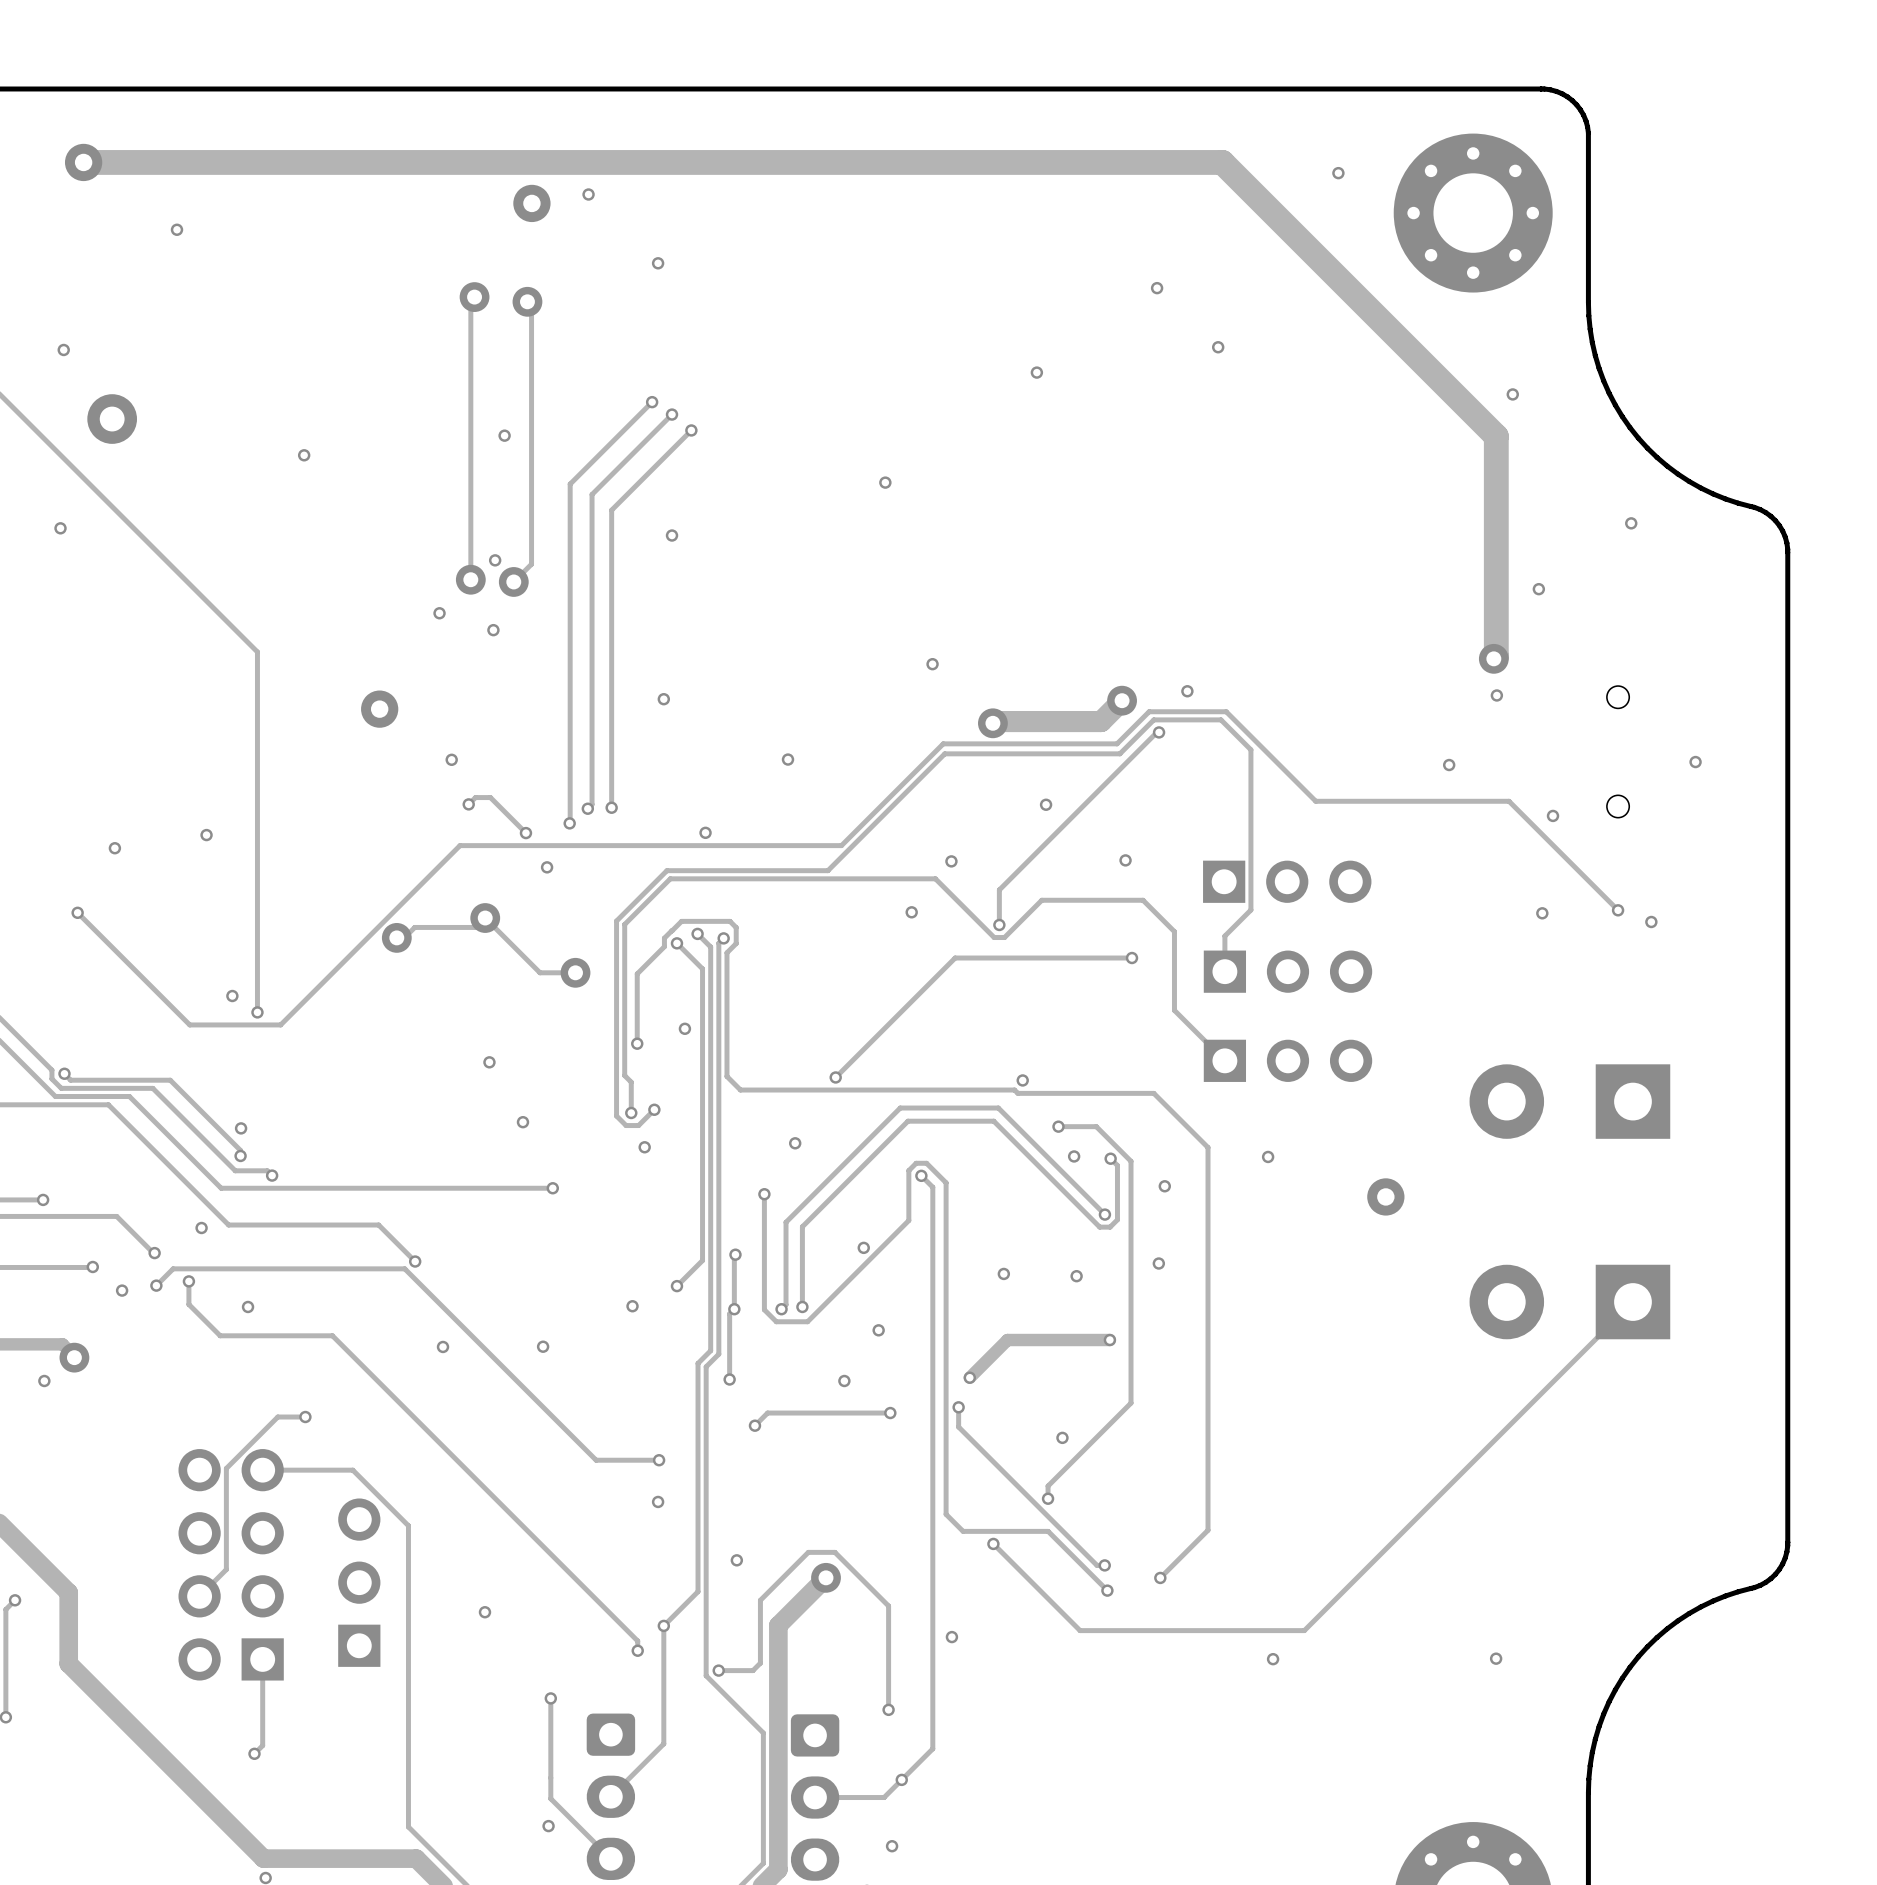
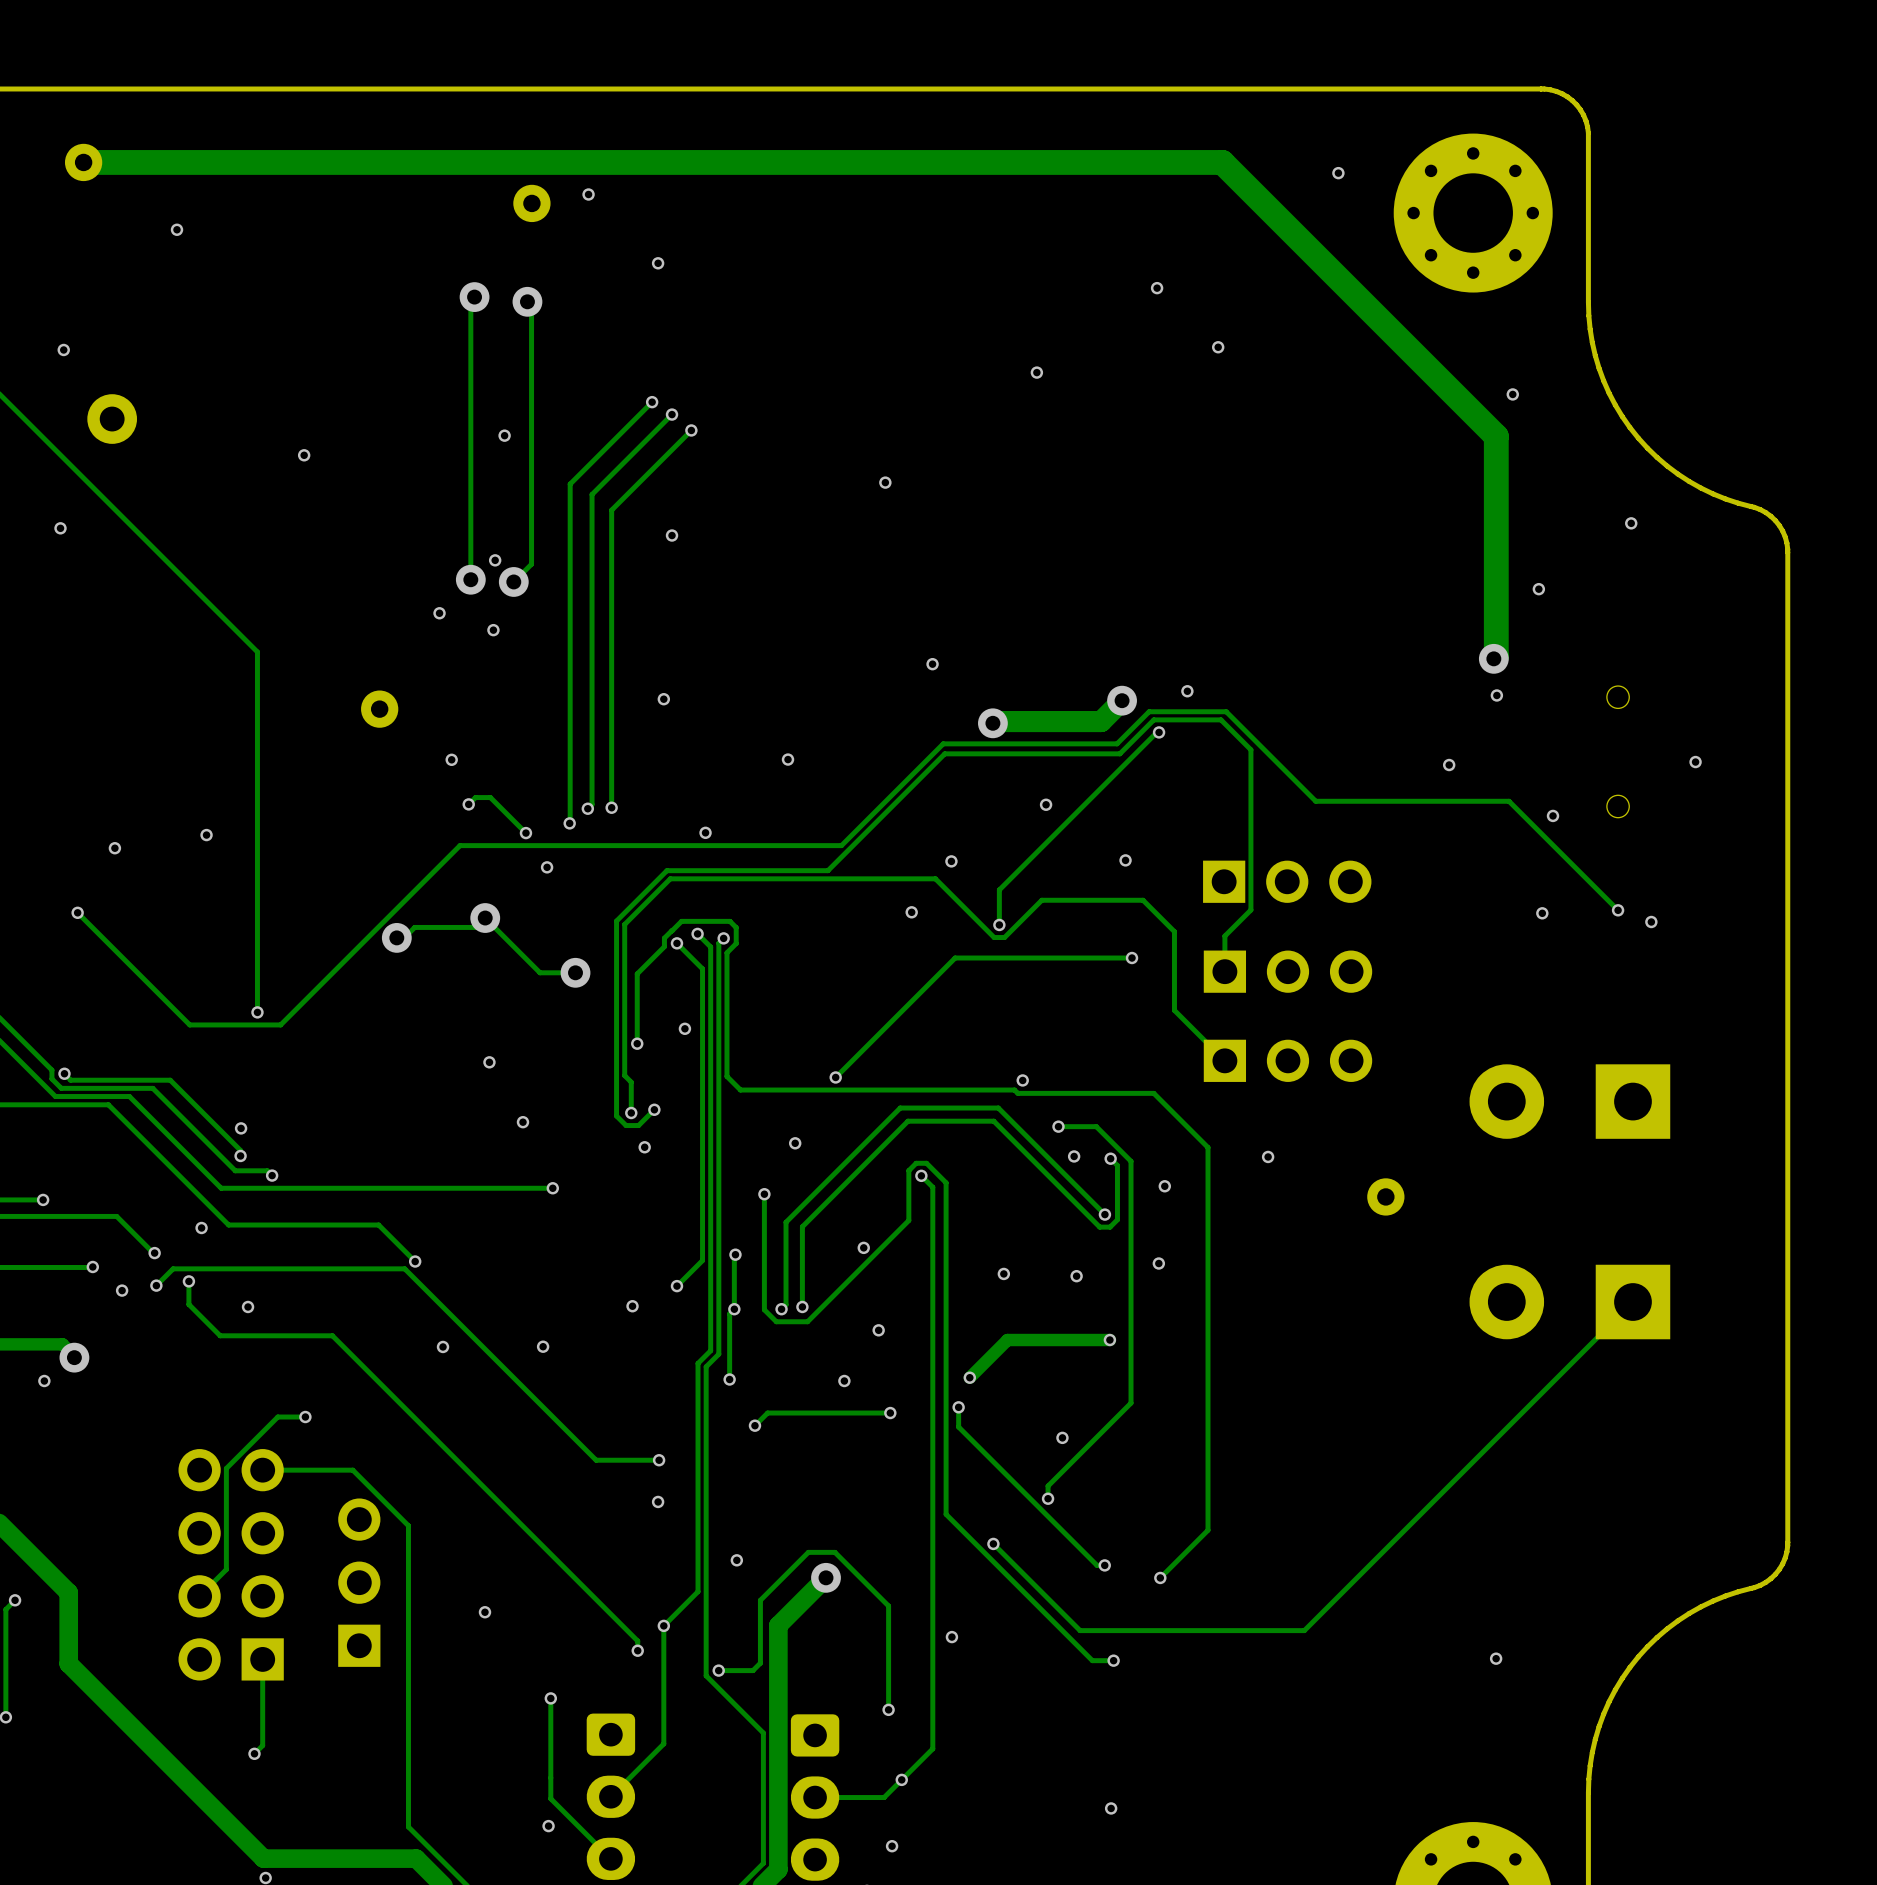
via: (232, 996) -> none
track: (963, 1531) (1048, 1531) (1107, 1590) -> (963, 1531) (1092, 1660) (1113, 1660)
via position: (1107, 1590) -> (1113, 1660)
via: (1273, 1659) -> none
via: none -> (1111, 1808)

